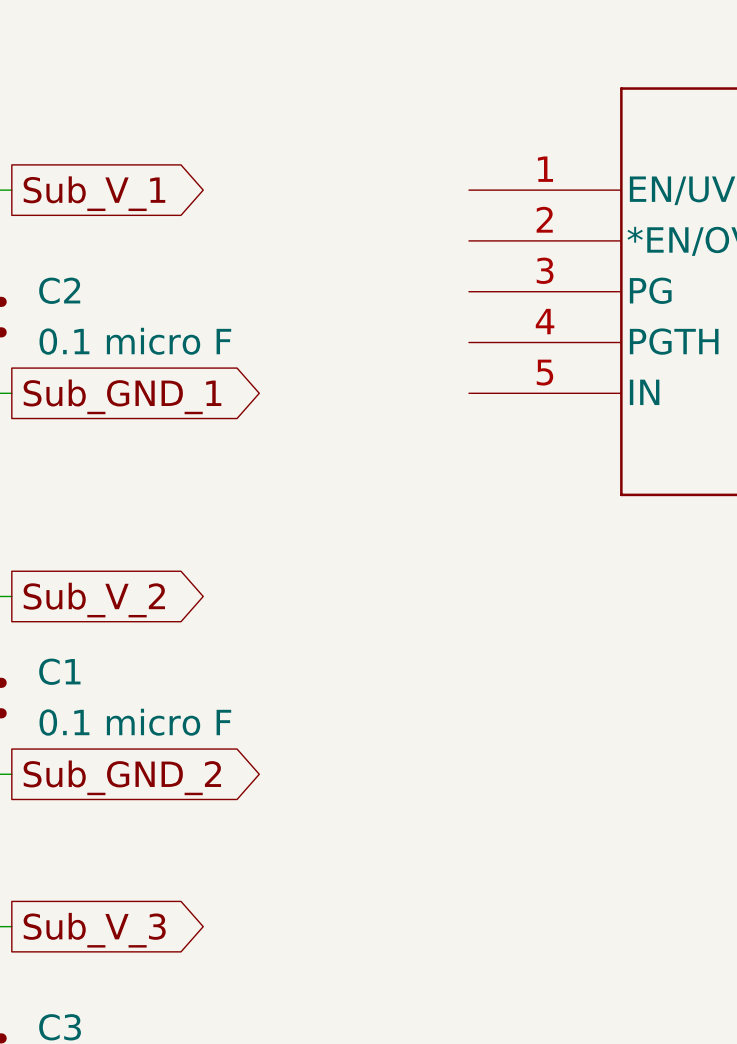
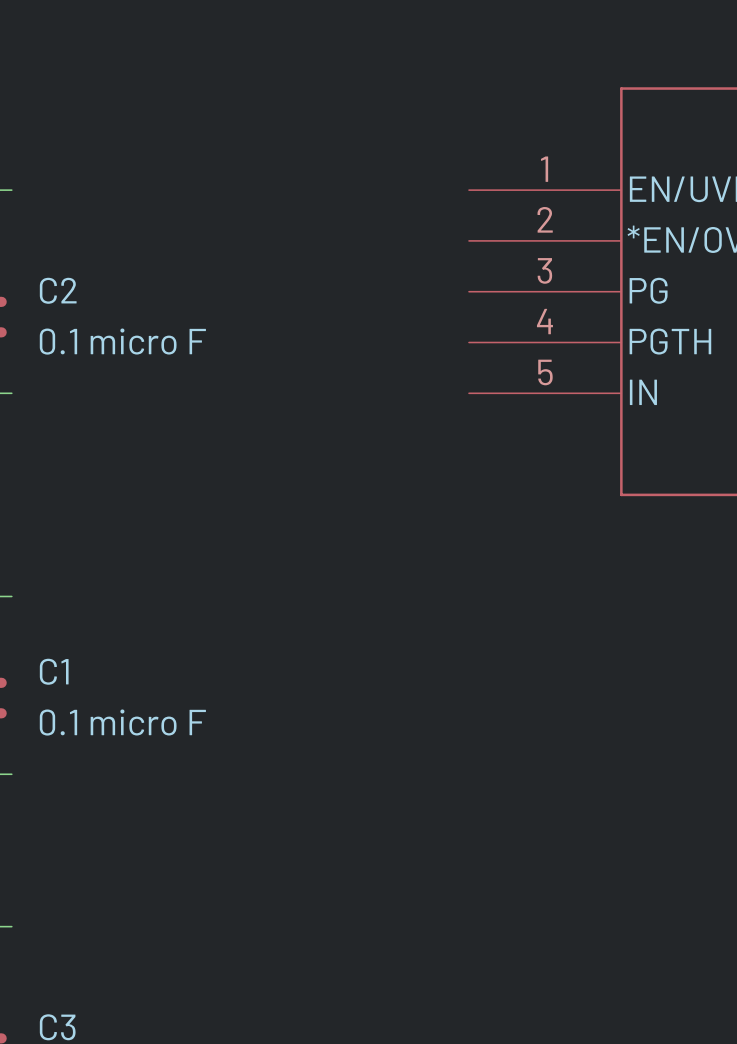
global label: Sub_V_1 (94, 193) -> none
global label: Sub_GND_1 (122, 396) -> none
global label: Sub_V_2 (94, 600) -> none
global label: Sub_GND_2 (122, 777) -> none
global label: Sub_V_3 (94, 930) -> none

